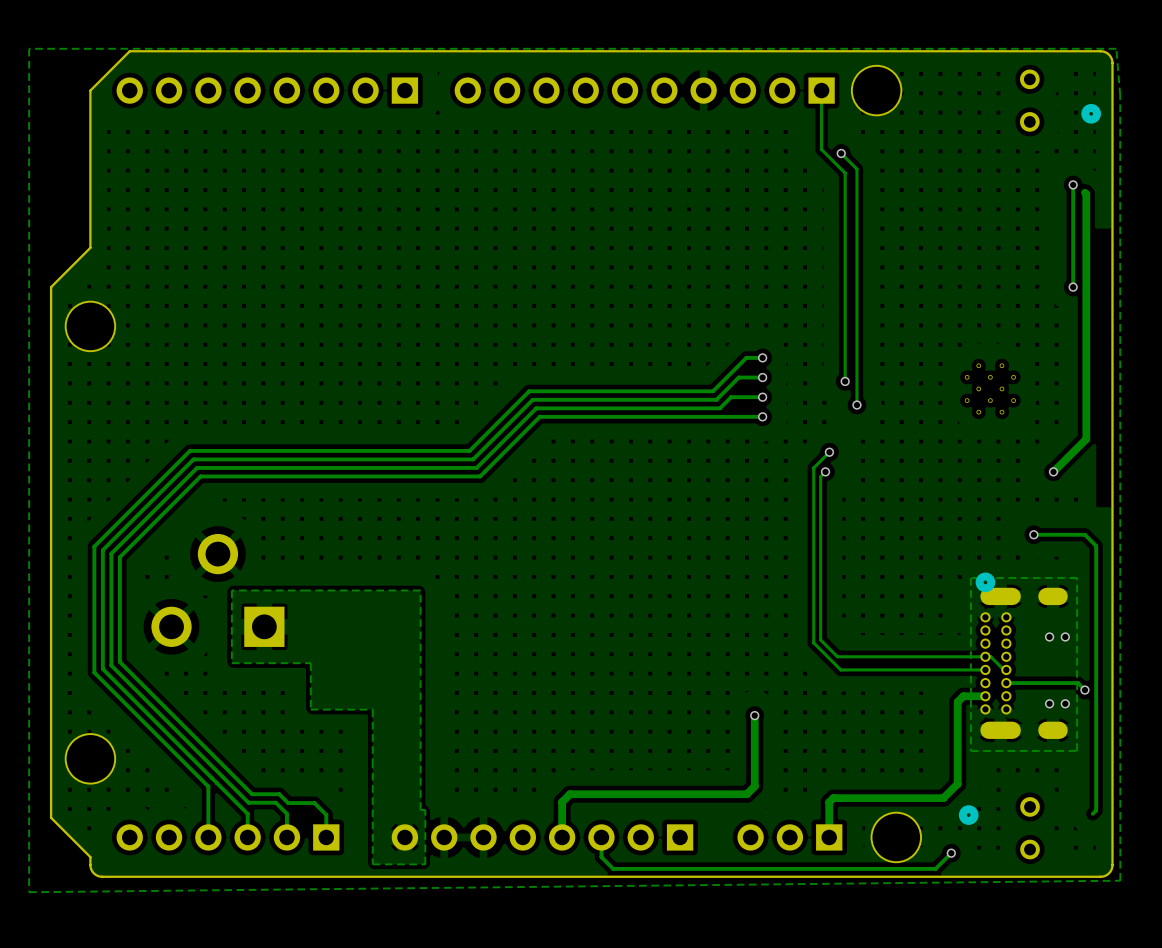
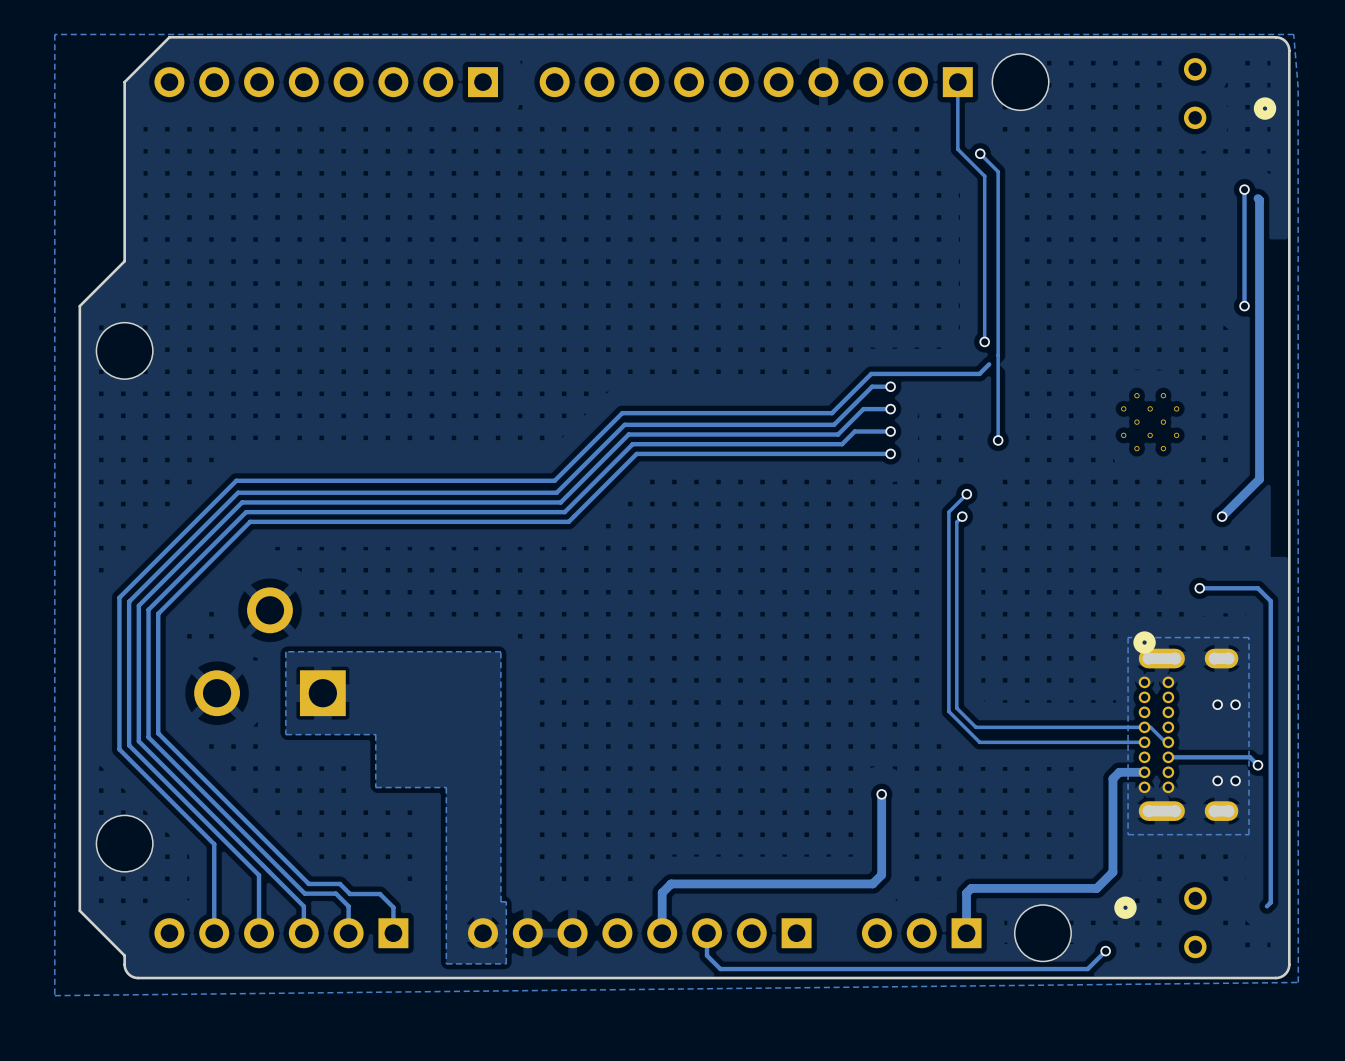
track: (845, 318) (845, 381) -> none
track: none -> (989, 364) (979, 373) (871, 373) (831, 413) (622, 413) (554, 480) (236, 480) (119, 597) (119, 749) (214, 844) (214, 933)
via position: (845, 381) -> (984, 341)

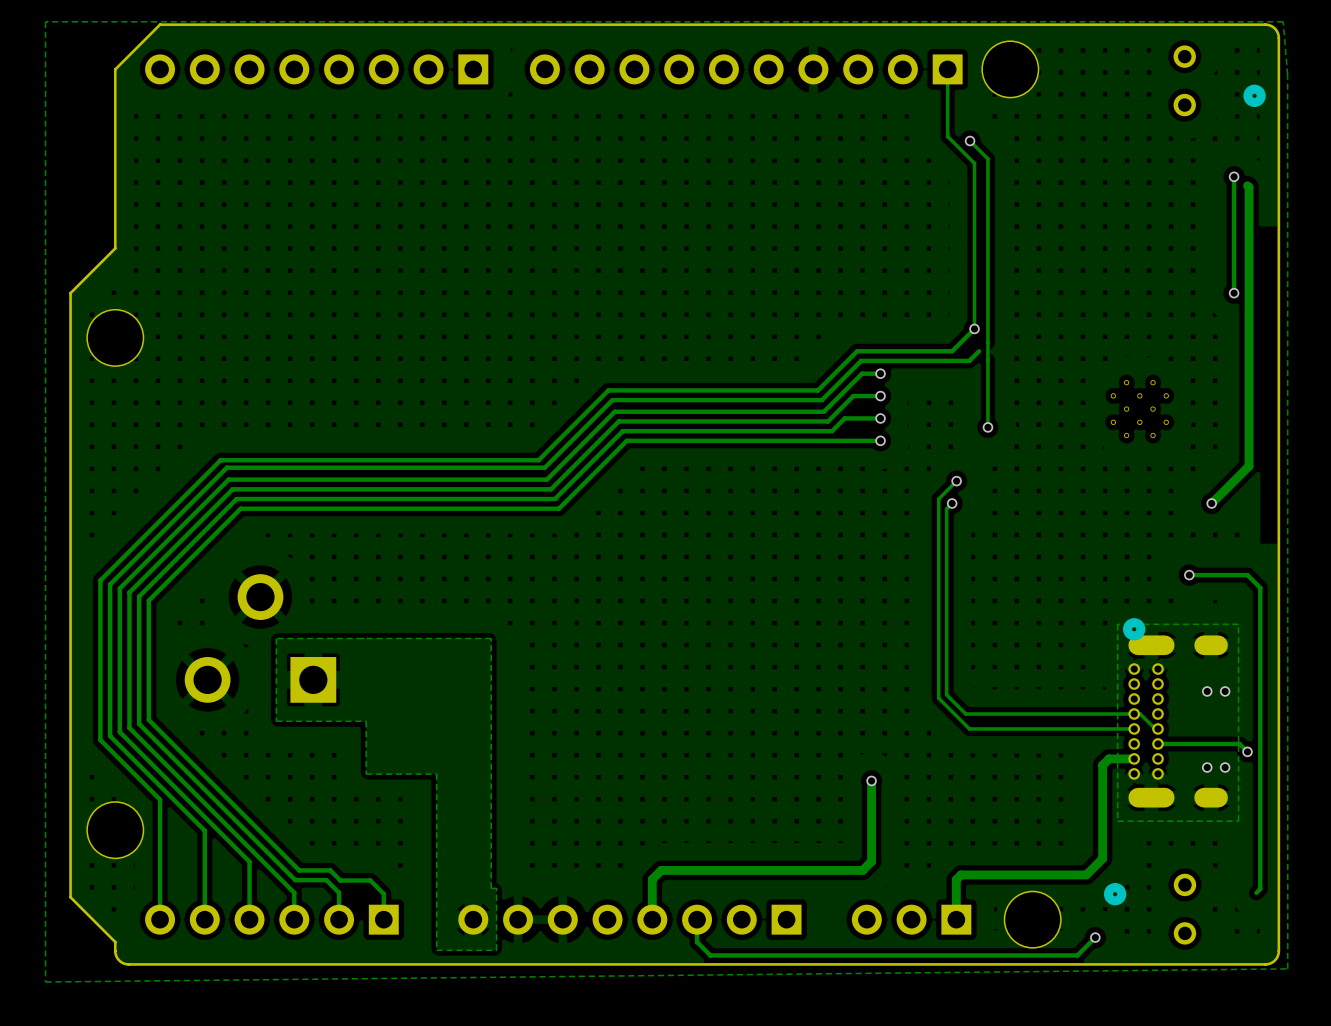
track: none -> (974, 328) (952, 351) (857, 351) (817, 390) (608, 390) (538, 460) (220, 460) (100, 580) (100, 740) (160, 799) (160, 919)

